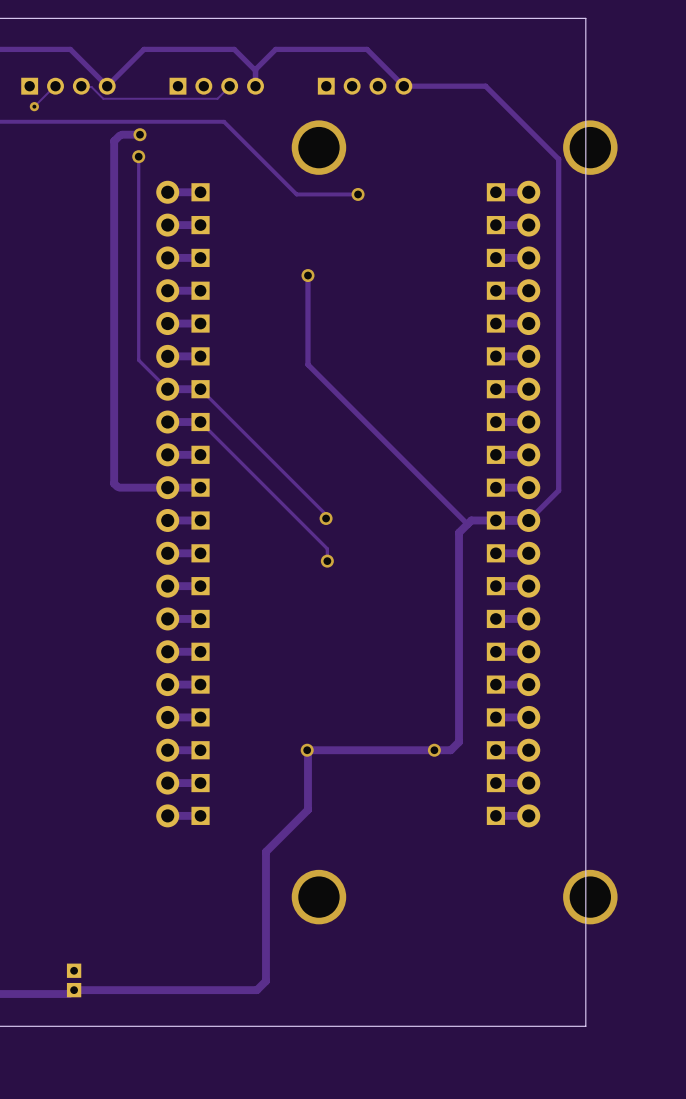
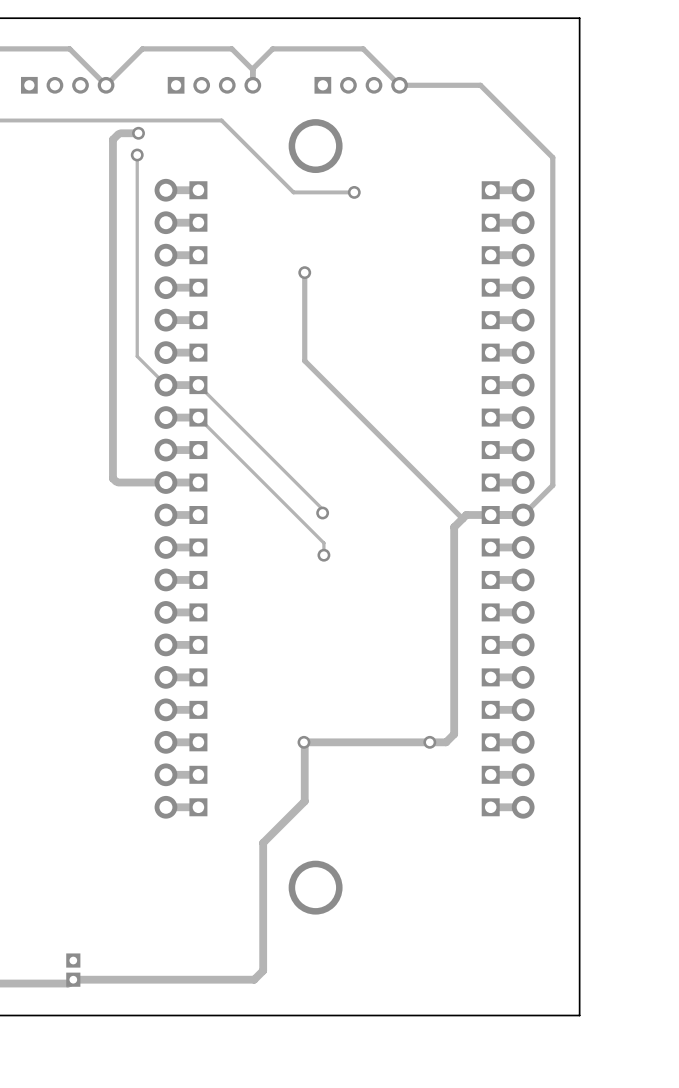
track: (55, 86) (34, 106) -> none
track: (229, 86) (217, 98) (103, 98) (91, 86) (81, 86) -> none
via: (34, 106) -> none
via: (590, 147) -> none
via: (590, 897) -> none

